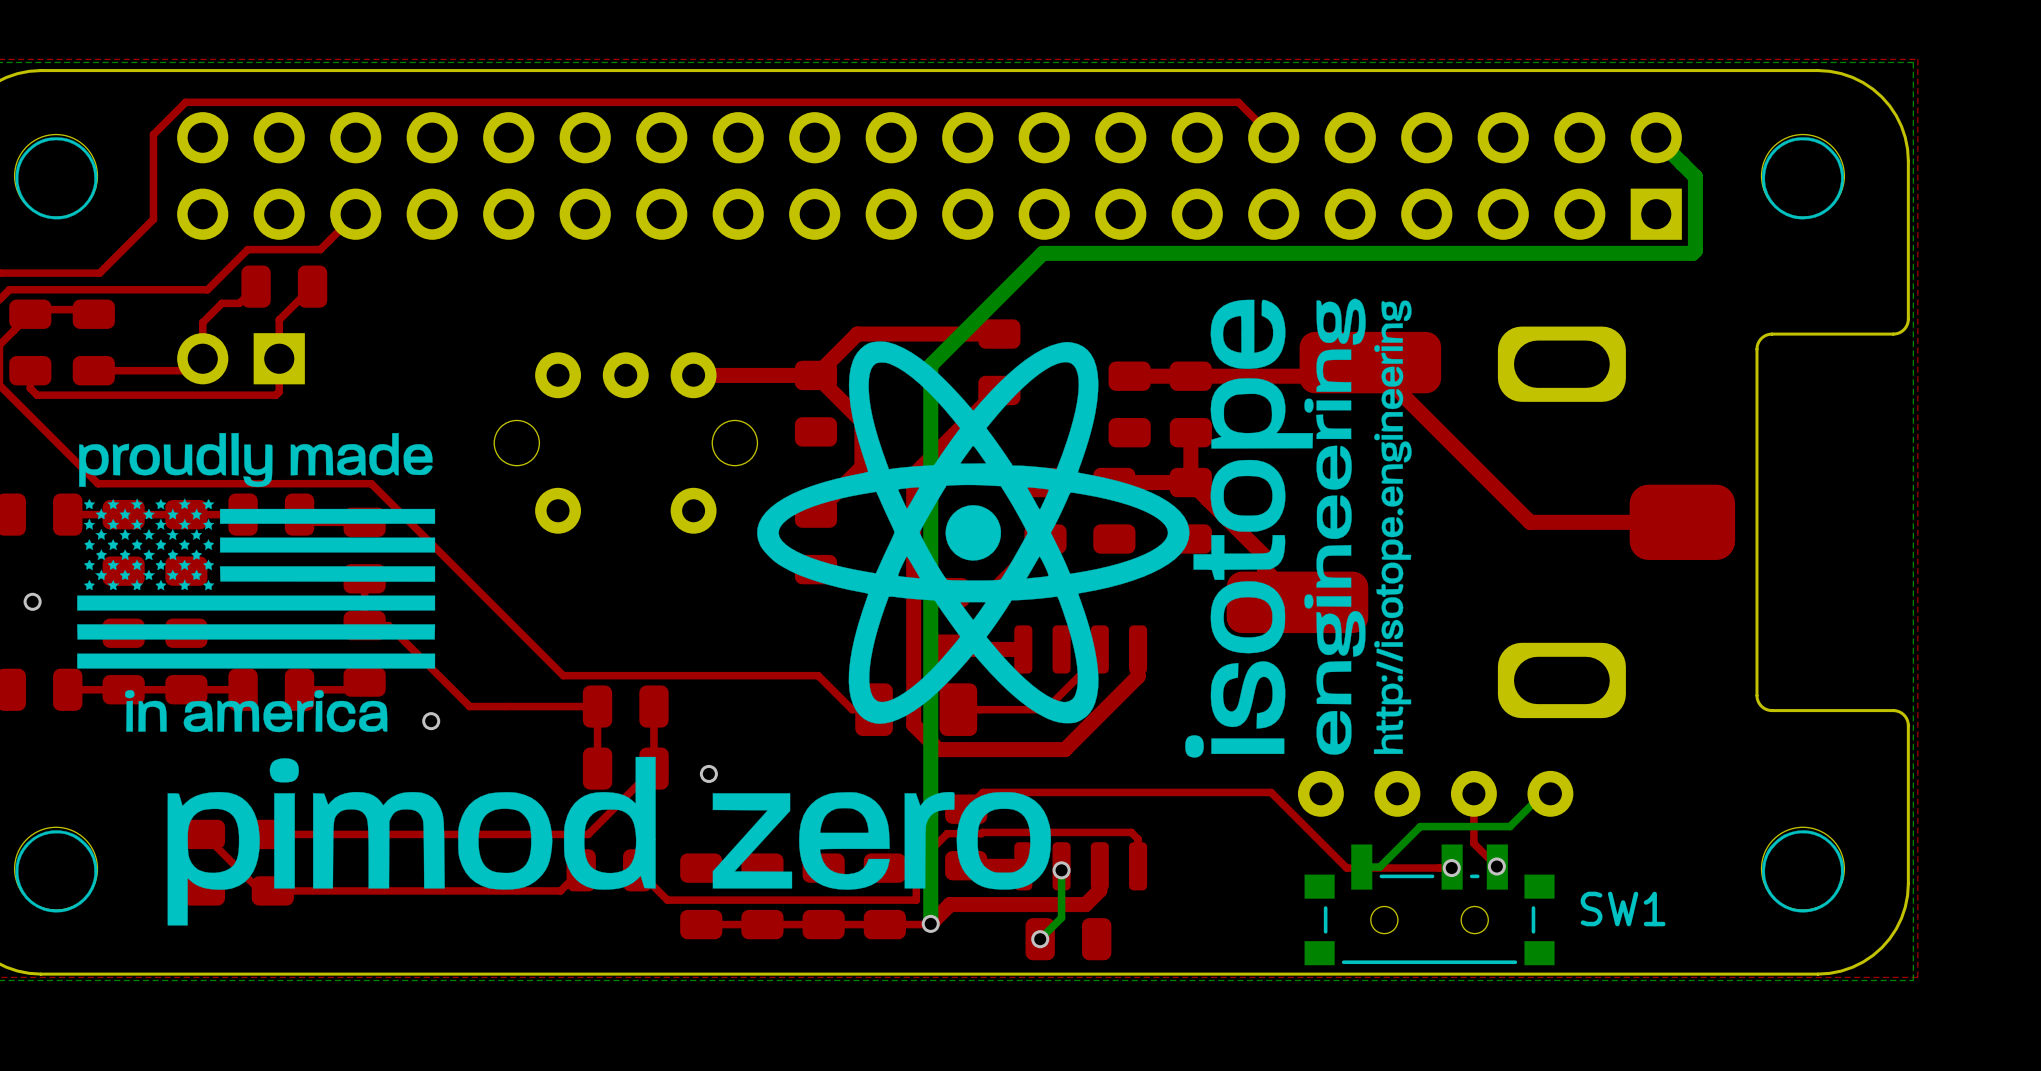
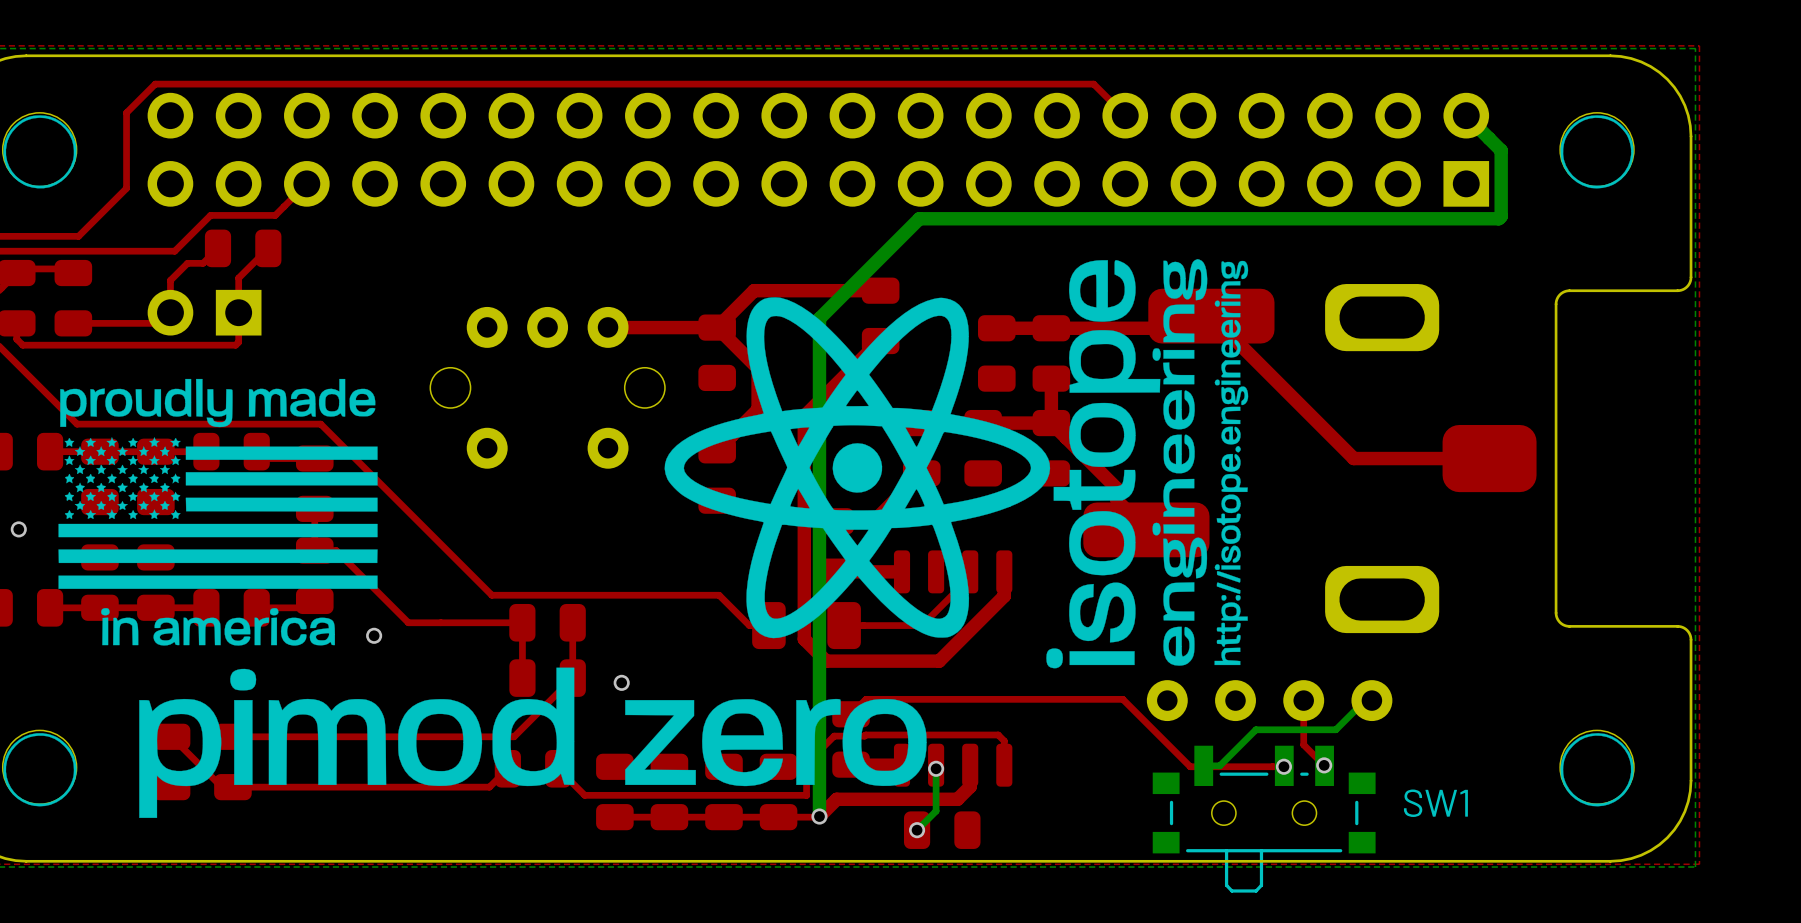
SW1 footprint: [1304, 844, 1555, 966] -> [1152, 745, 1376, 893]

